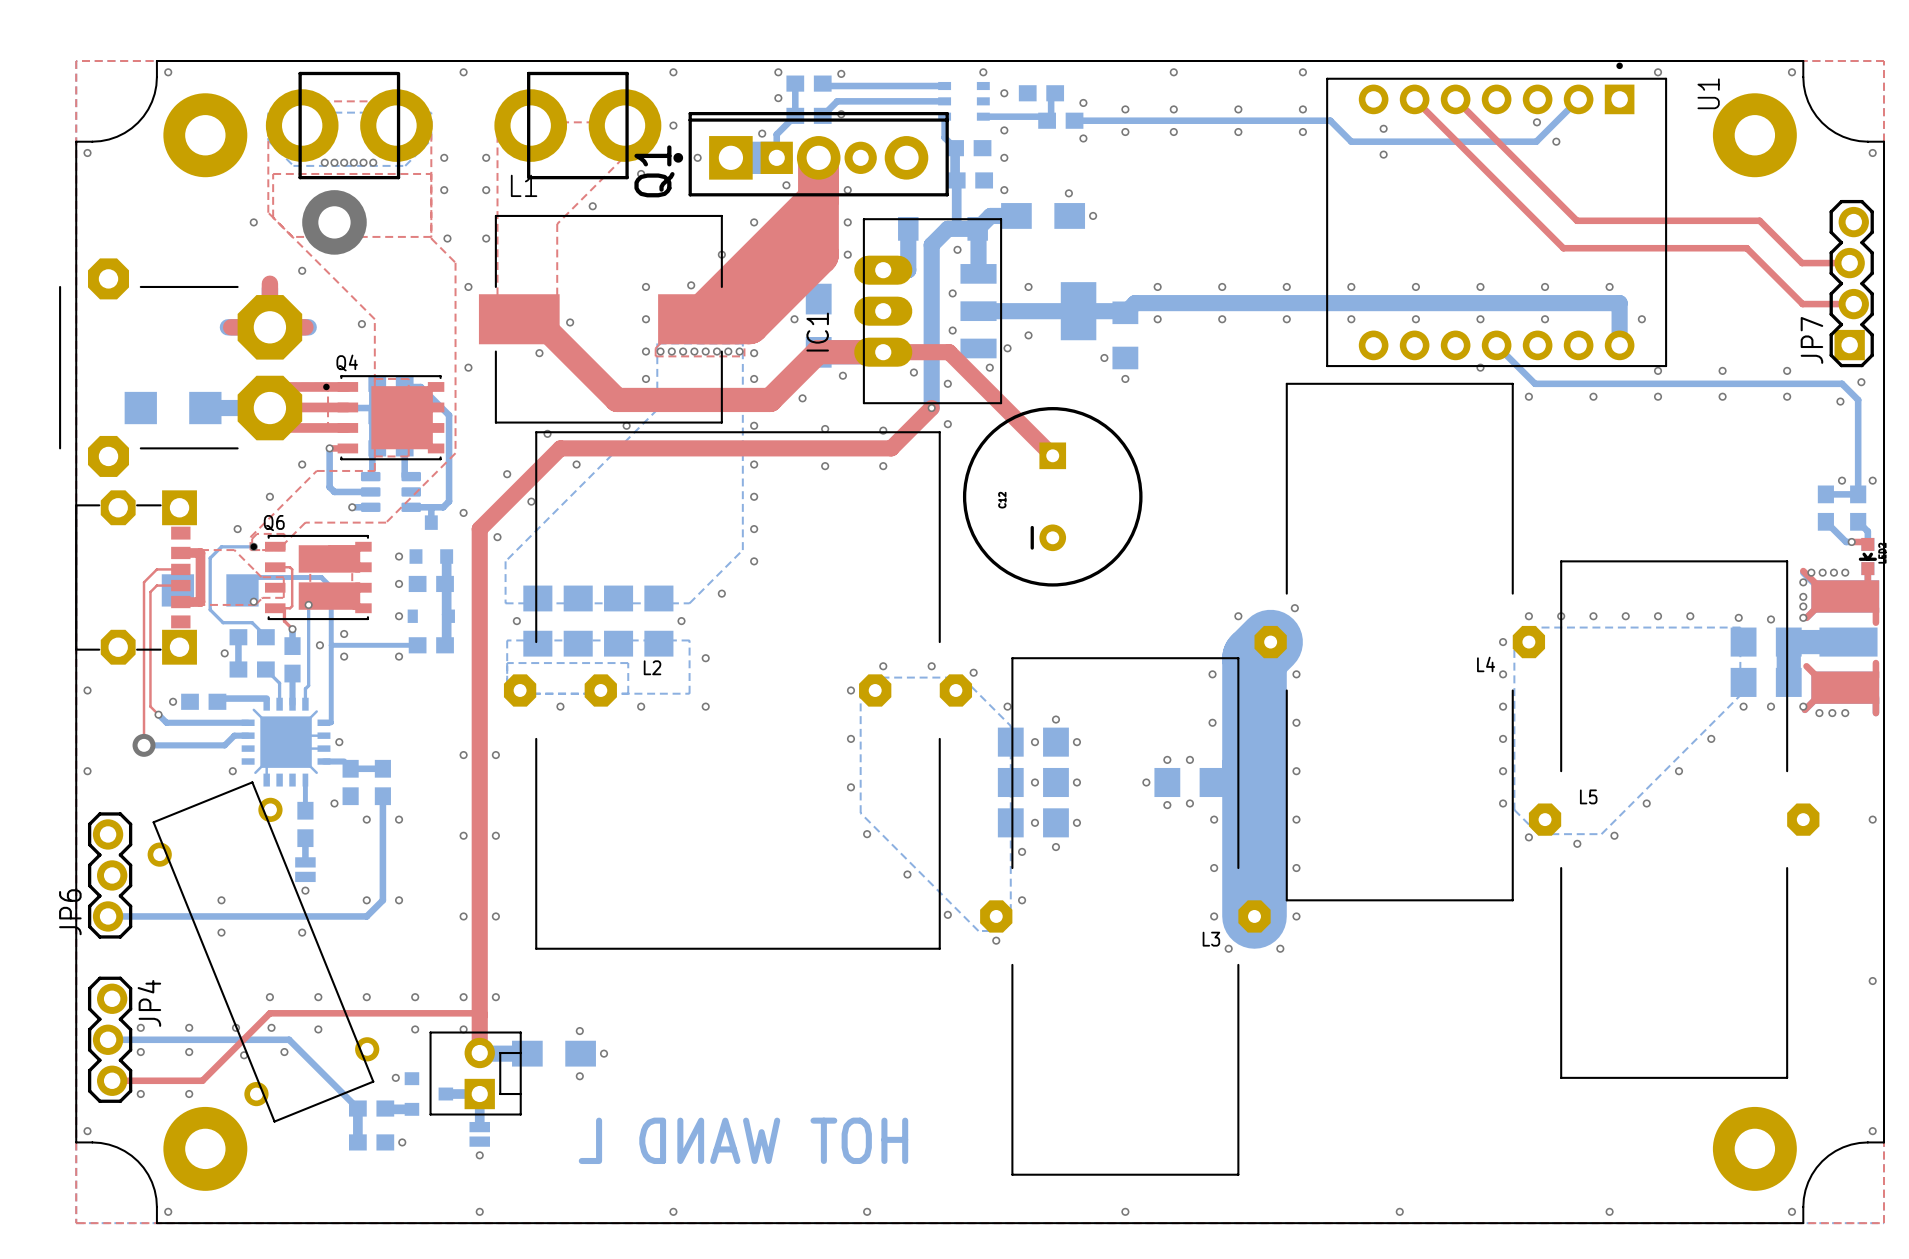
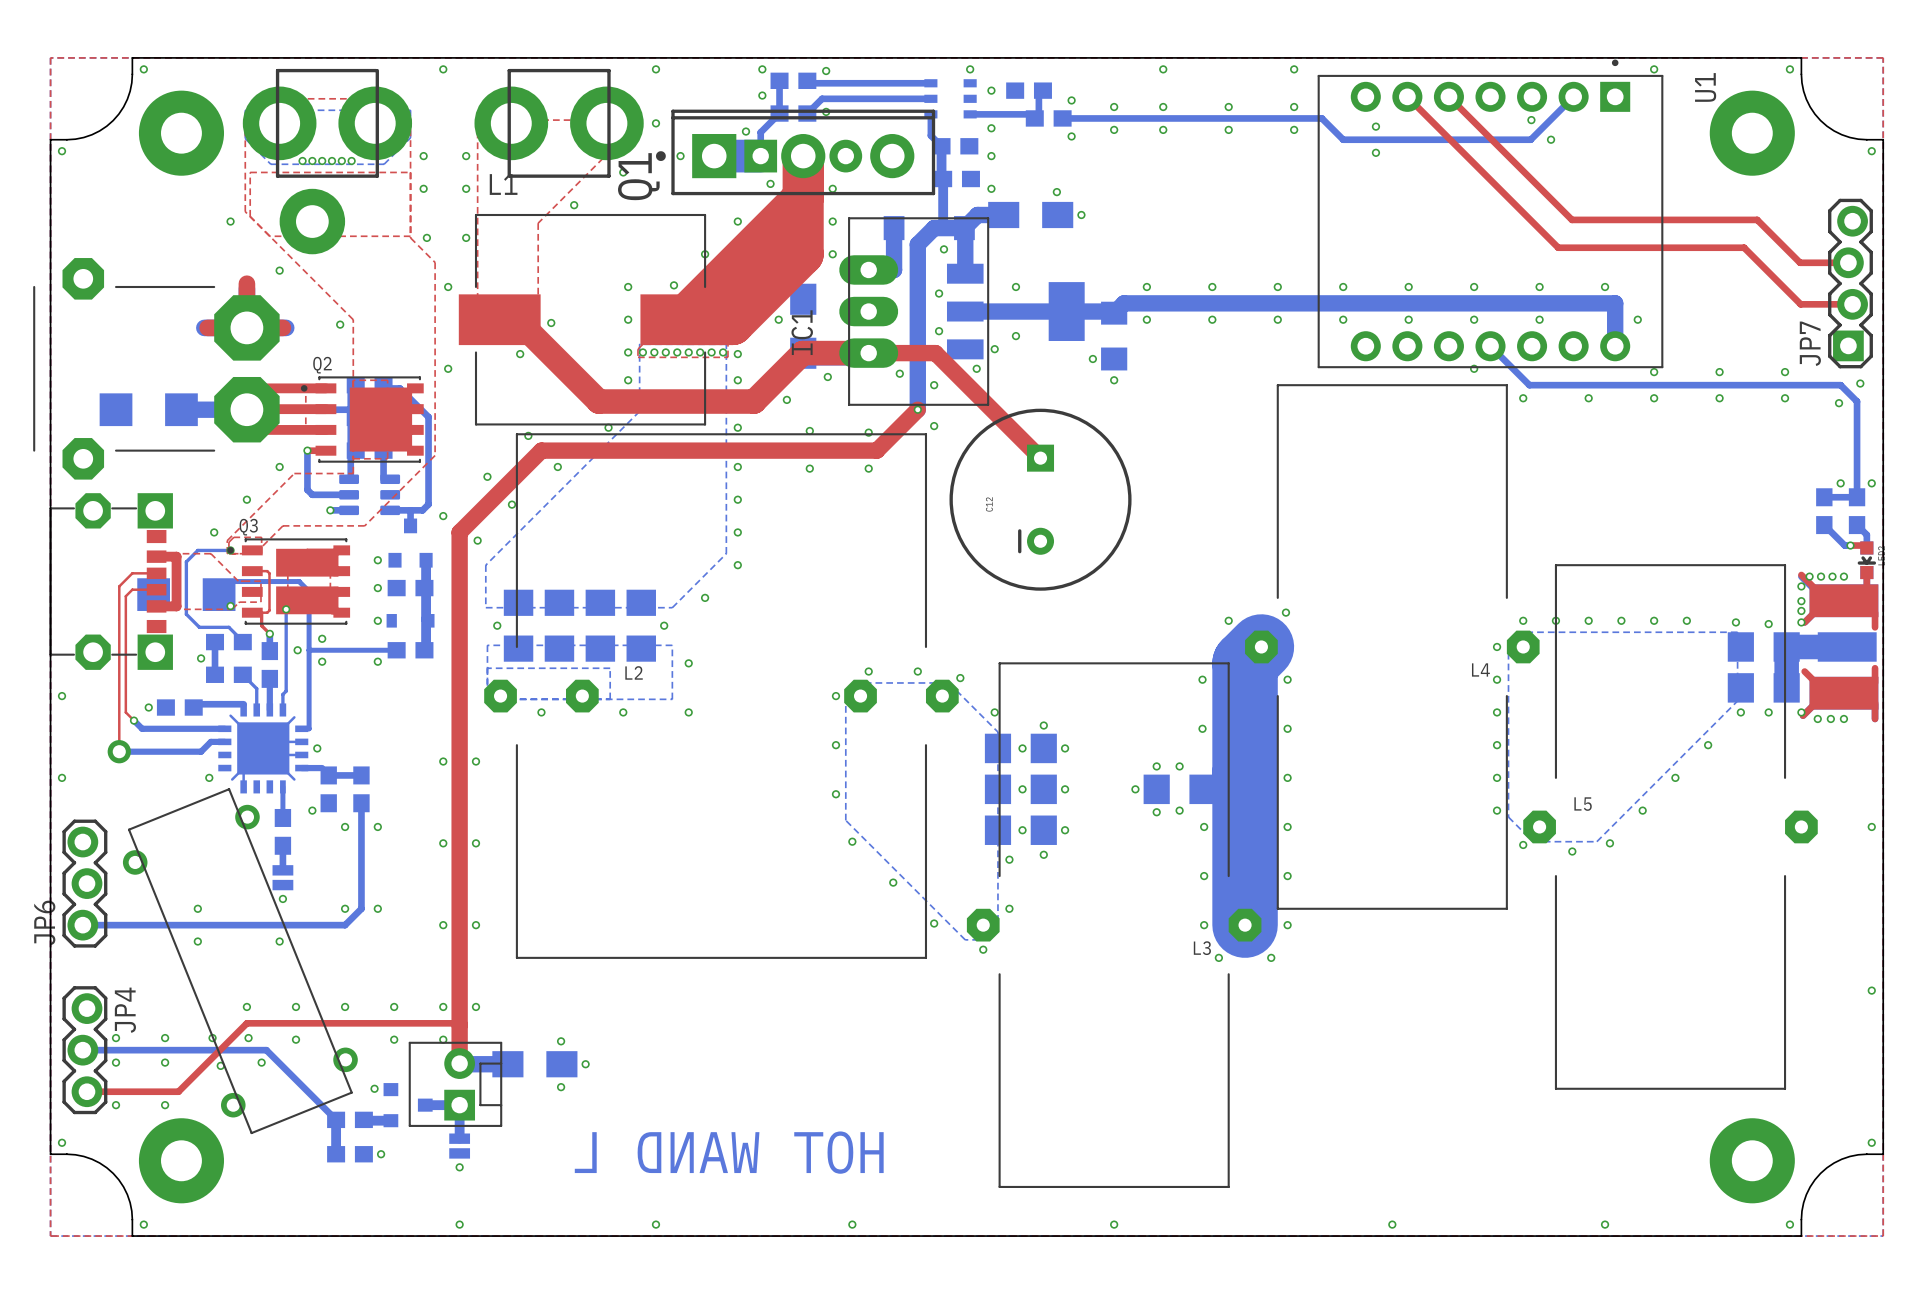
Q4 name: Q4 (347, 362) -> Q2 (322, 365)
Q6 name: Q6 (274, 523) -> Q3 (248, 527)

